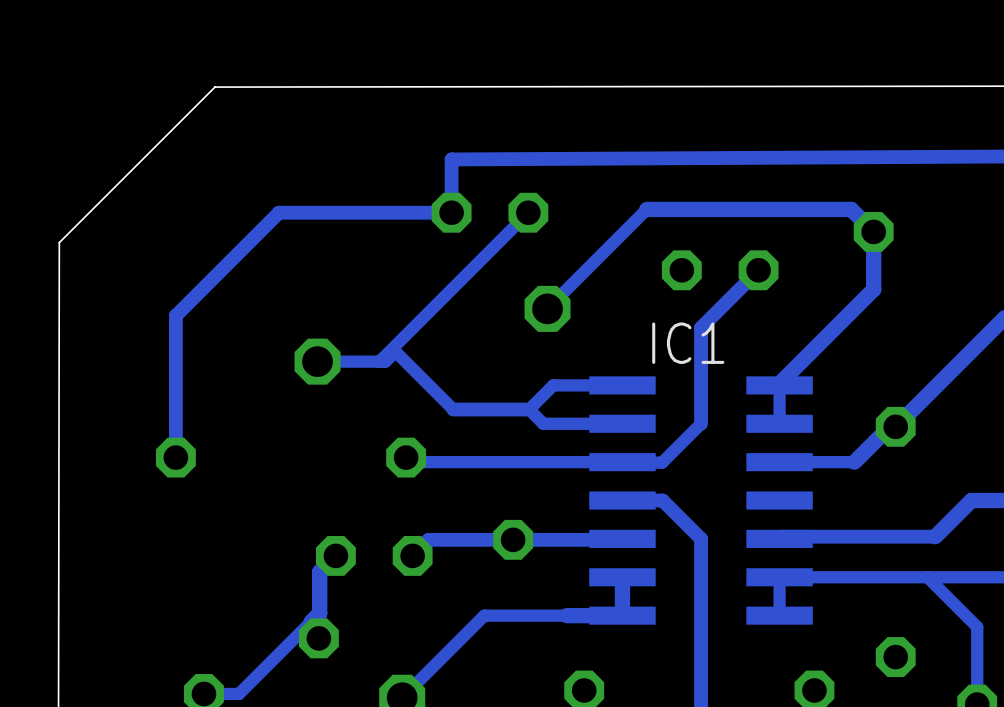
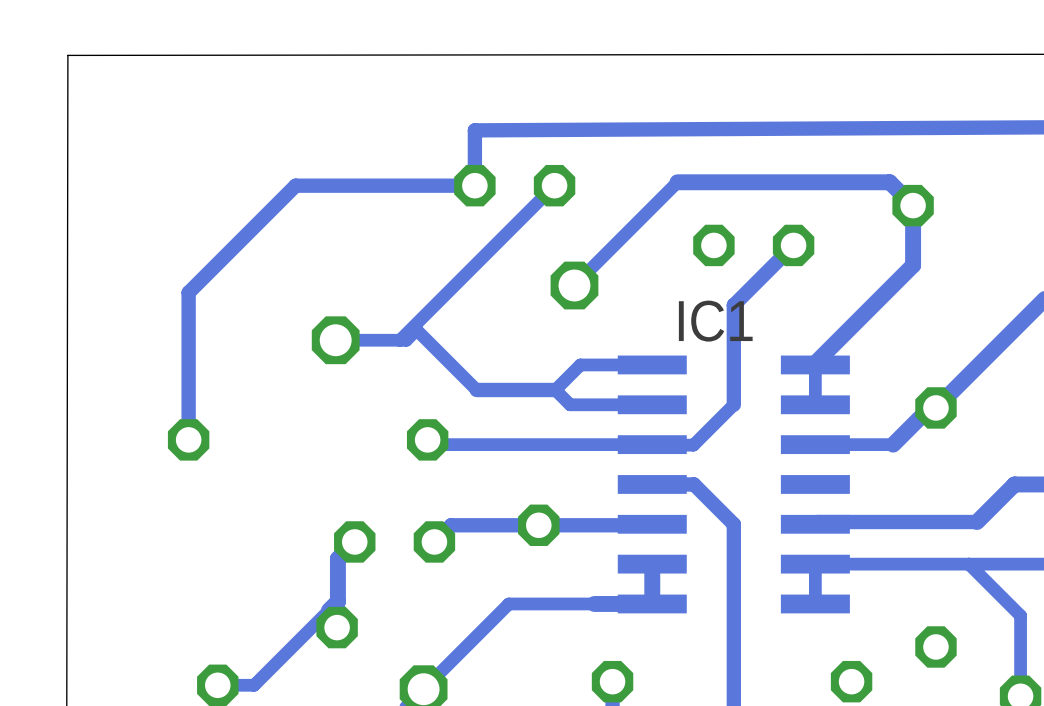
board edge: (215, 87) (59, 242) -> (229, 55) (67, 55) (67, 216)

